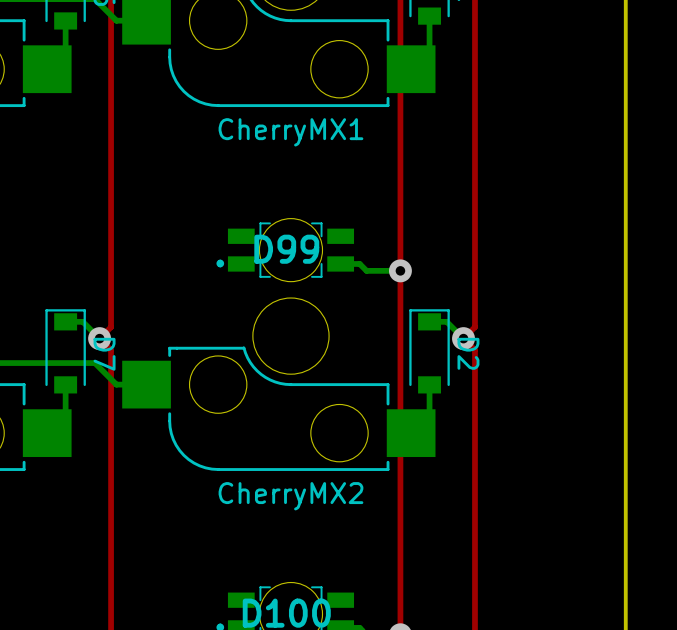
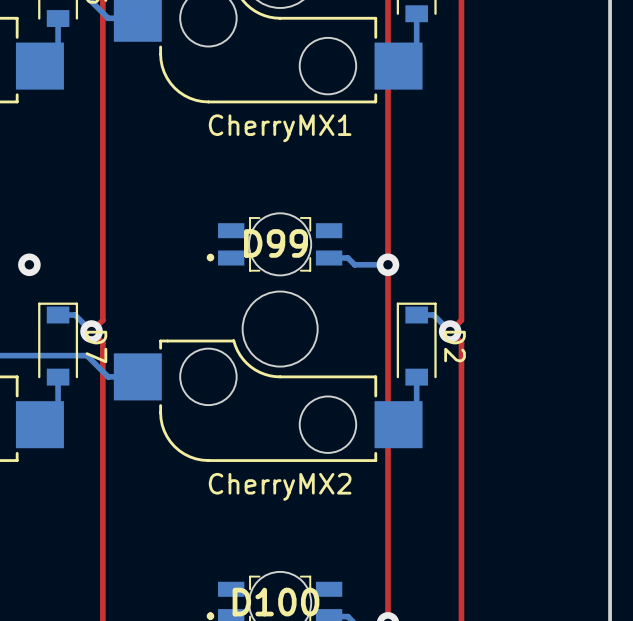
via: none -> (29, 264)

